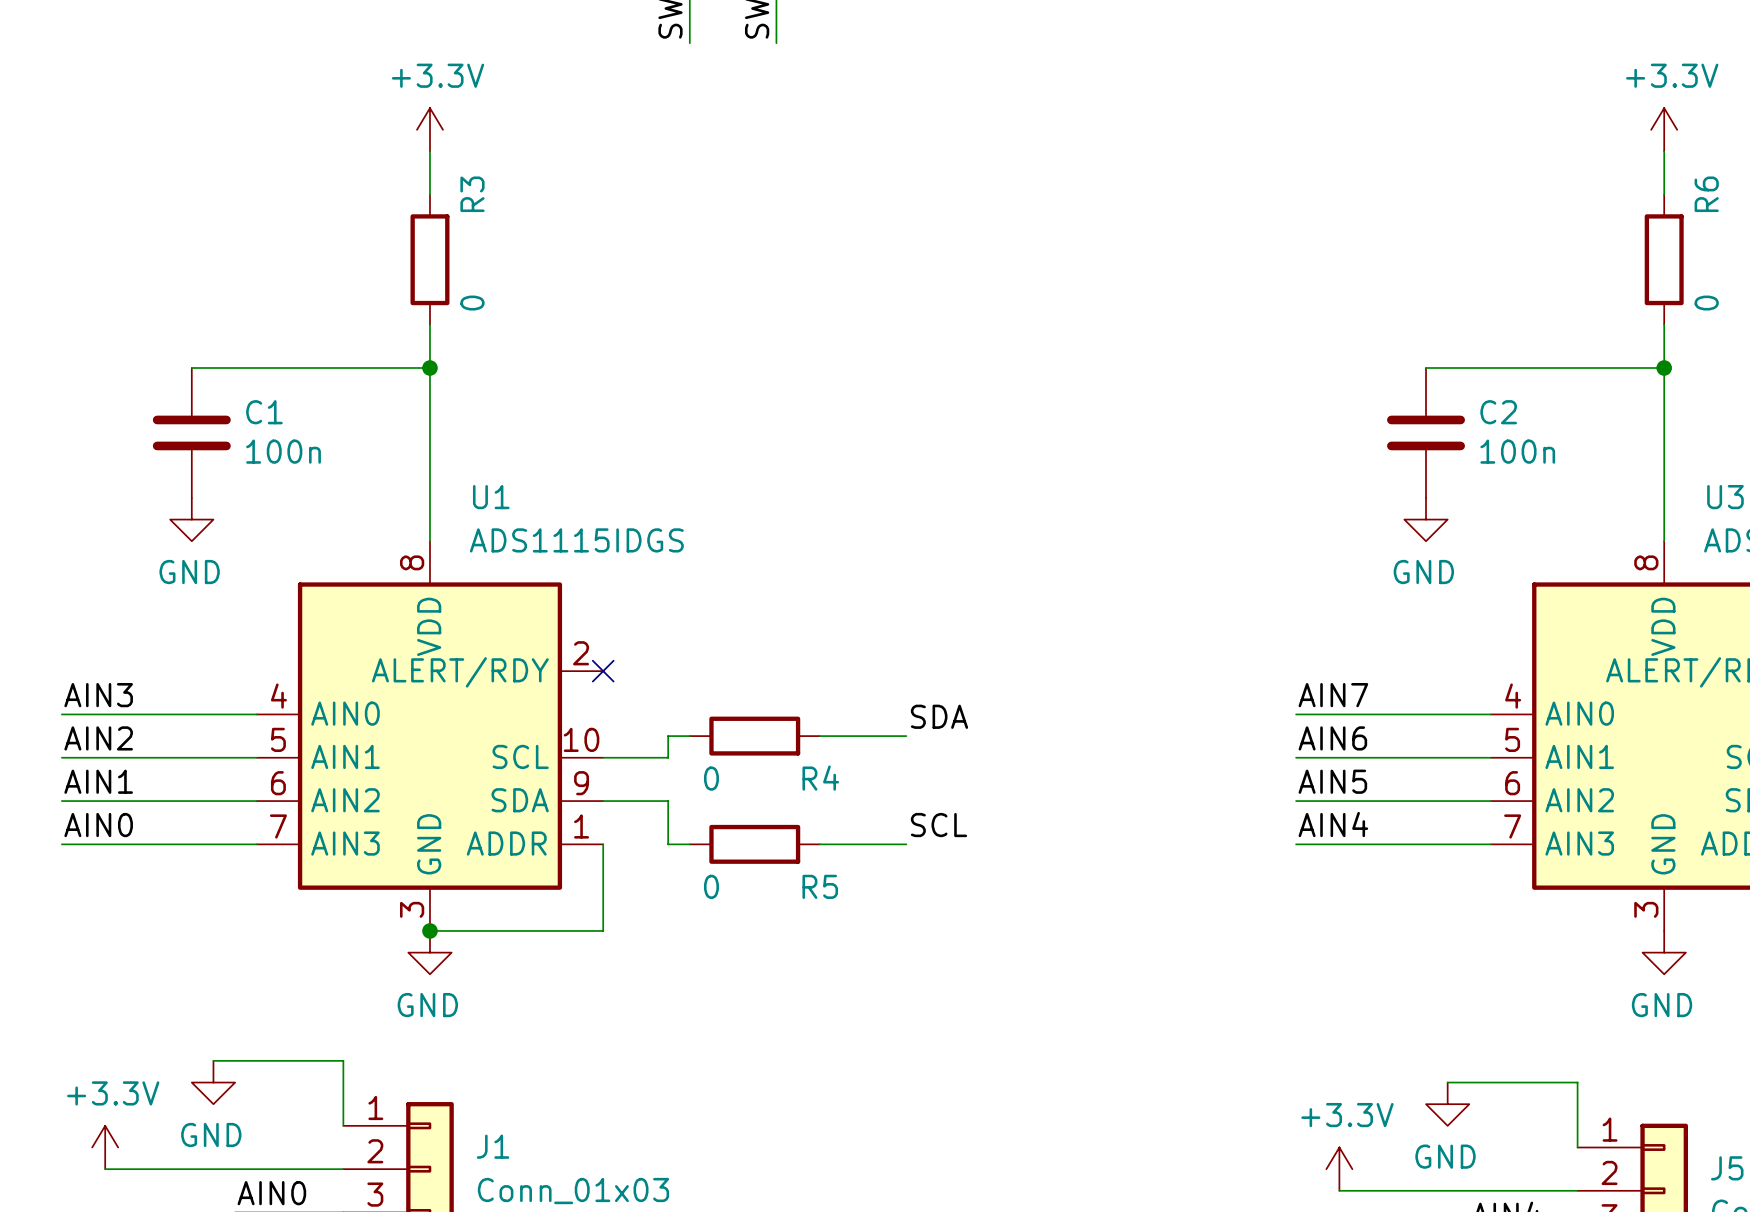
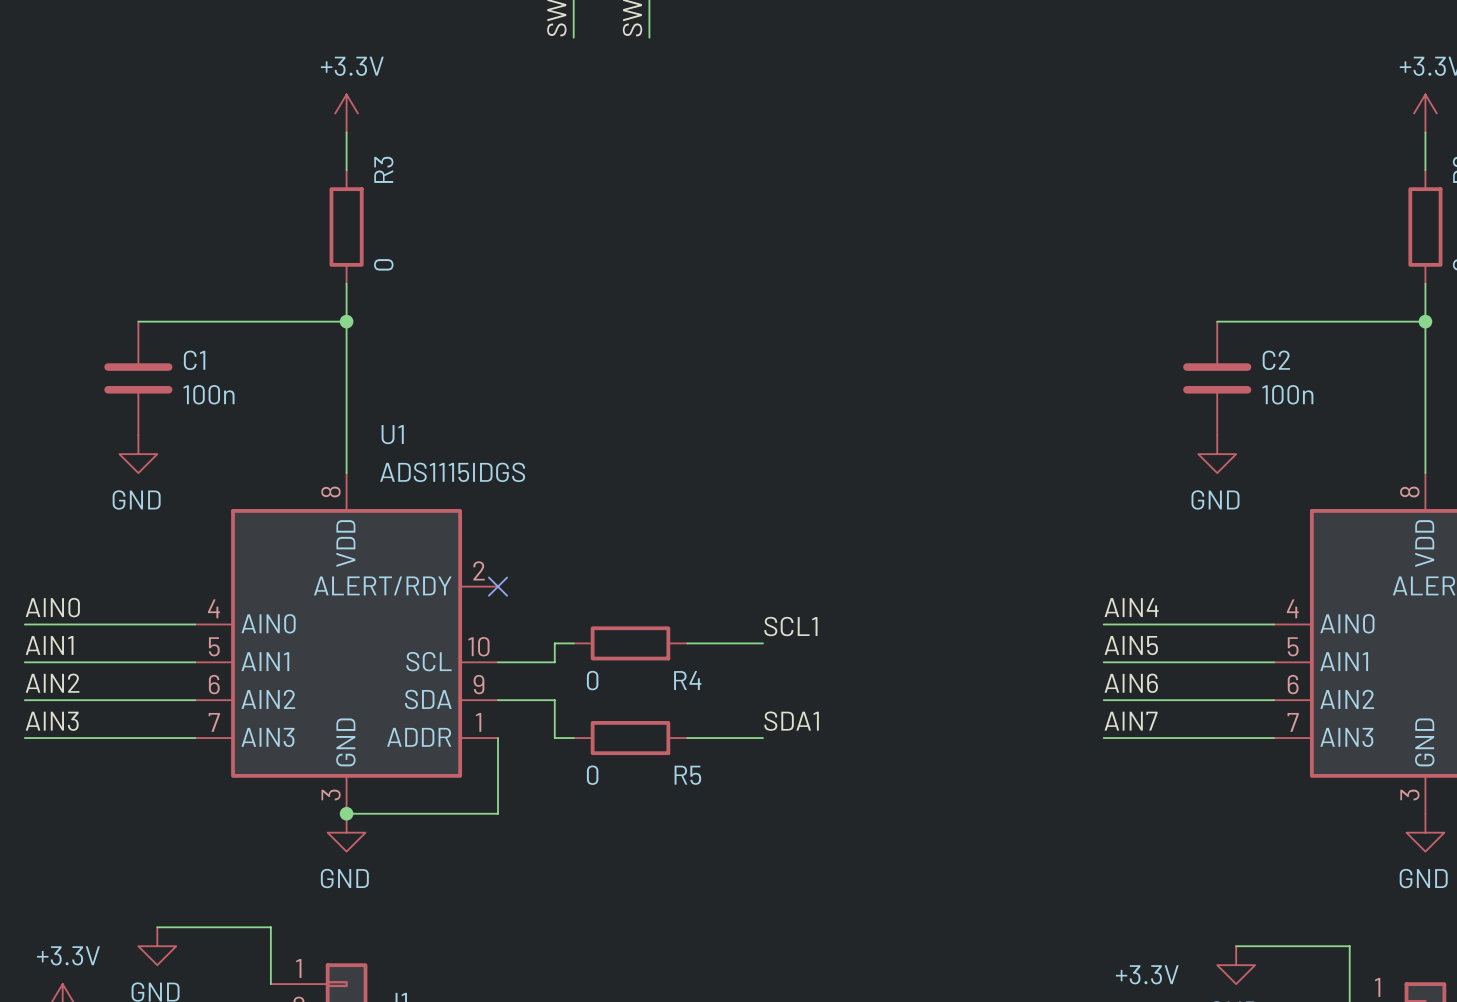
label: AIN3 (98, 695) -> AIN0 (52, 607)
label: AIN7 (1333, 695) -> AIN4 (1131, 607)
label: SDA (939, 716) -> SCL1 (790, 626)
label: AIN2 (98, 738) -> AIN1 (49, 645)
label: AIN6 (1332, 738) -> AIN5 (1131, 645)
label: AIN1 (98, 781) -> AIN2 (52, 683)
label: AIN5 (1332, 781) -> AIN6 (1131, 683)
label: AIN4 (1333, 824) -> AIN7 (1131, 721)
label: AIN0 (98, 825) -> AIN3 (52, 721)
label: SCL (938, 825) -> SDA1 (791, 721)

